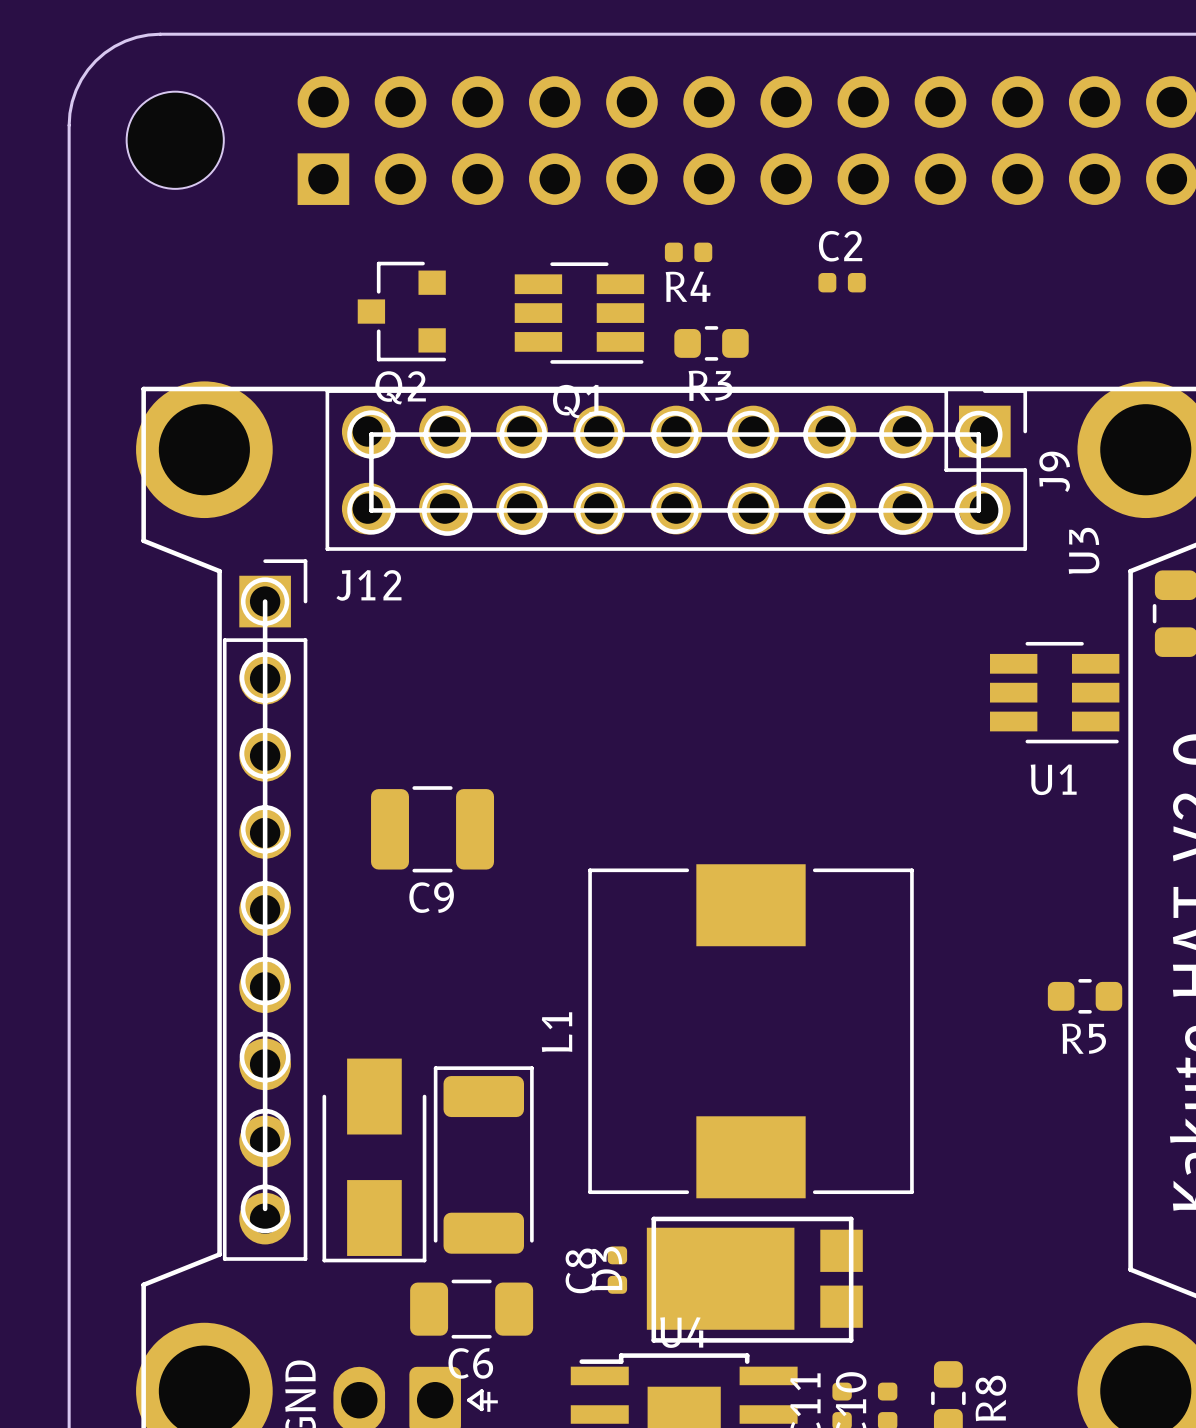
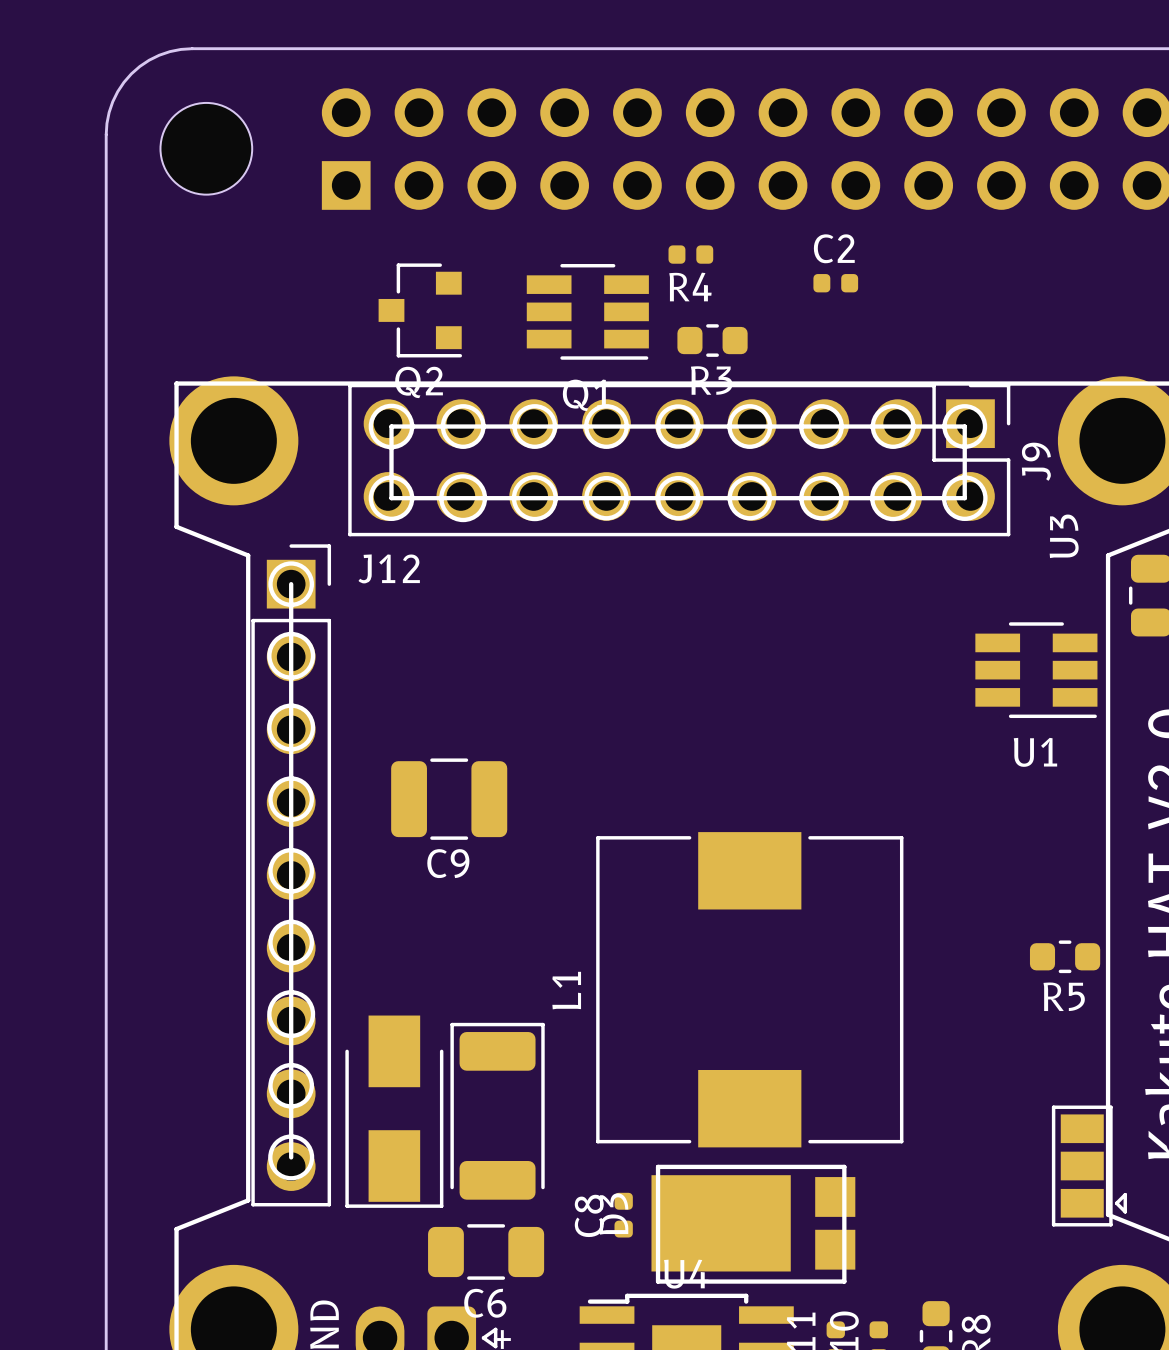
part: none -> (1089, 1166)

